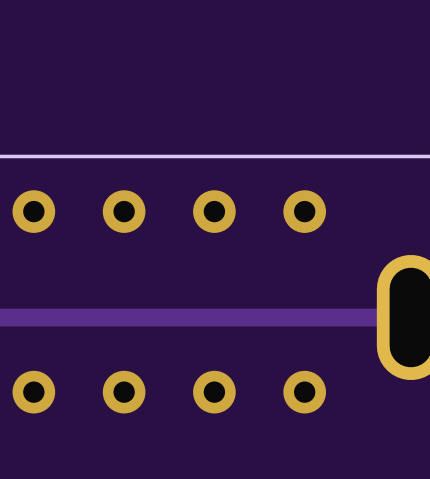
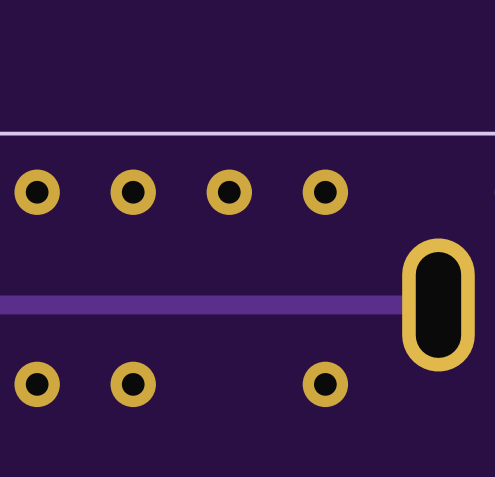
via: (214, 392) -> none

